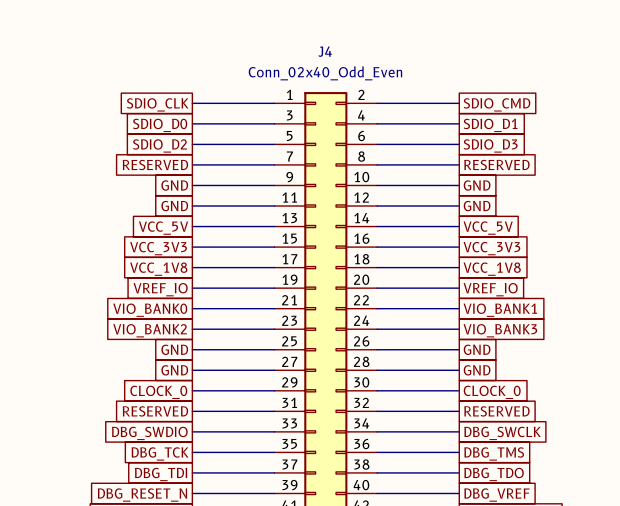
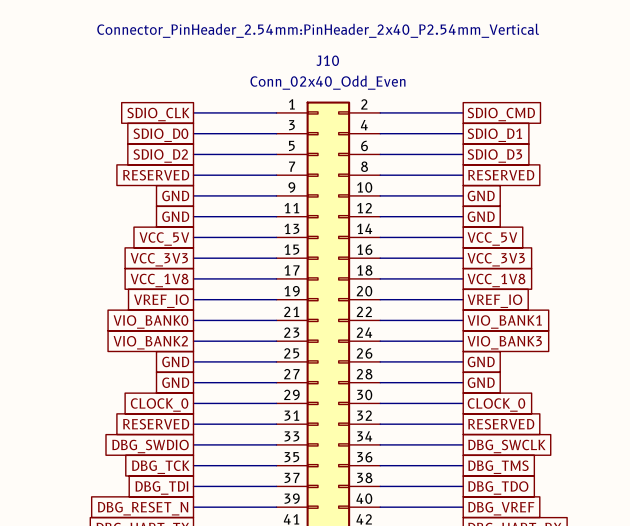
J4 text: none -> Connector_PinHeader_2.54mm:PinHeader_2x40_P2.54mm_Vertical (318, 30)
J4 name: J4 (325, 51) -> J10 (327, 60)

